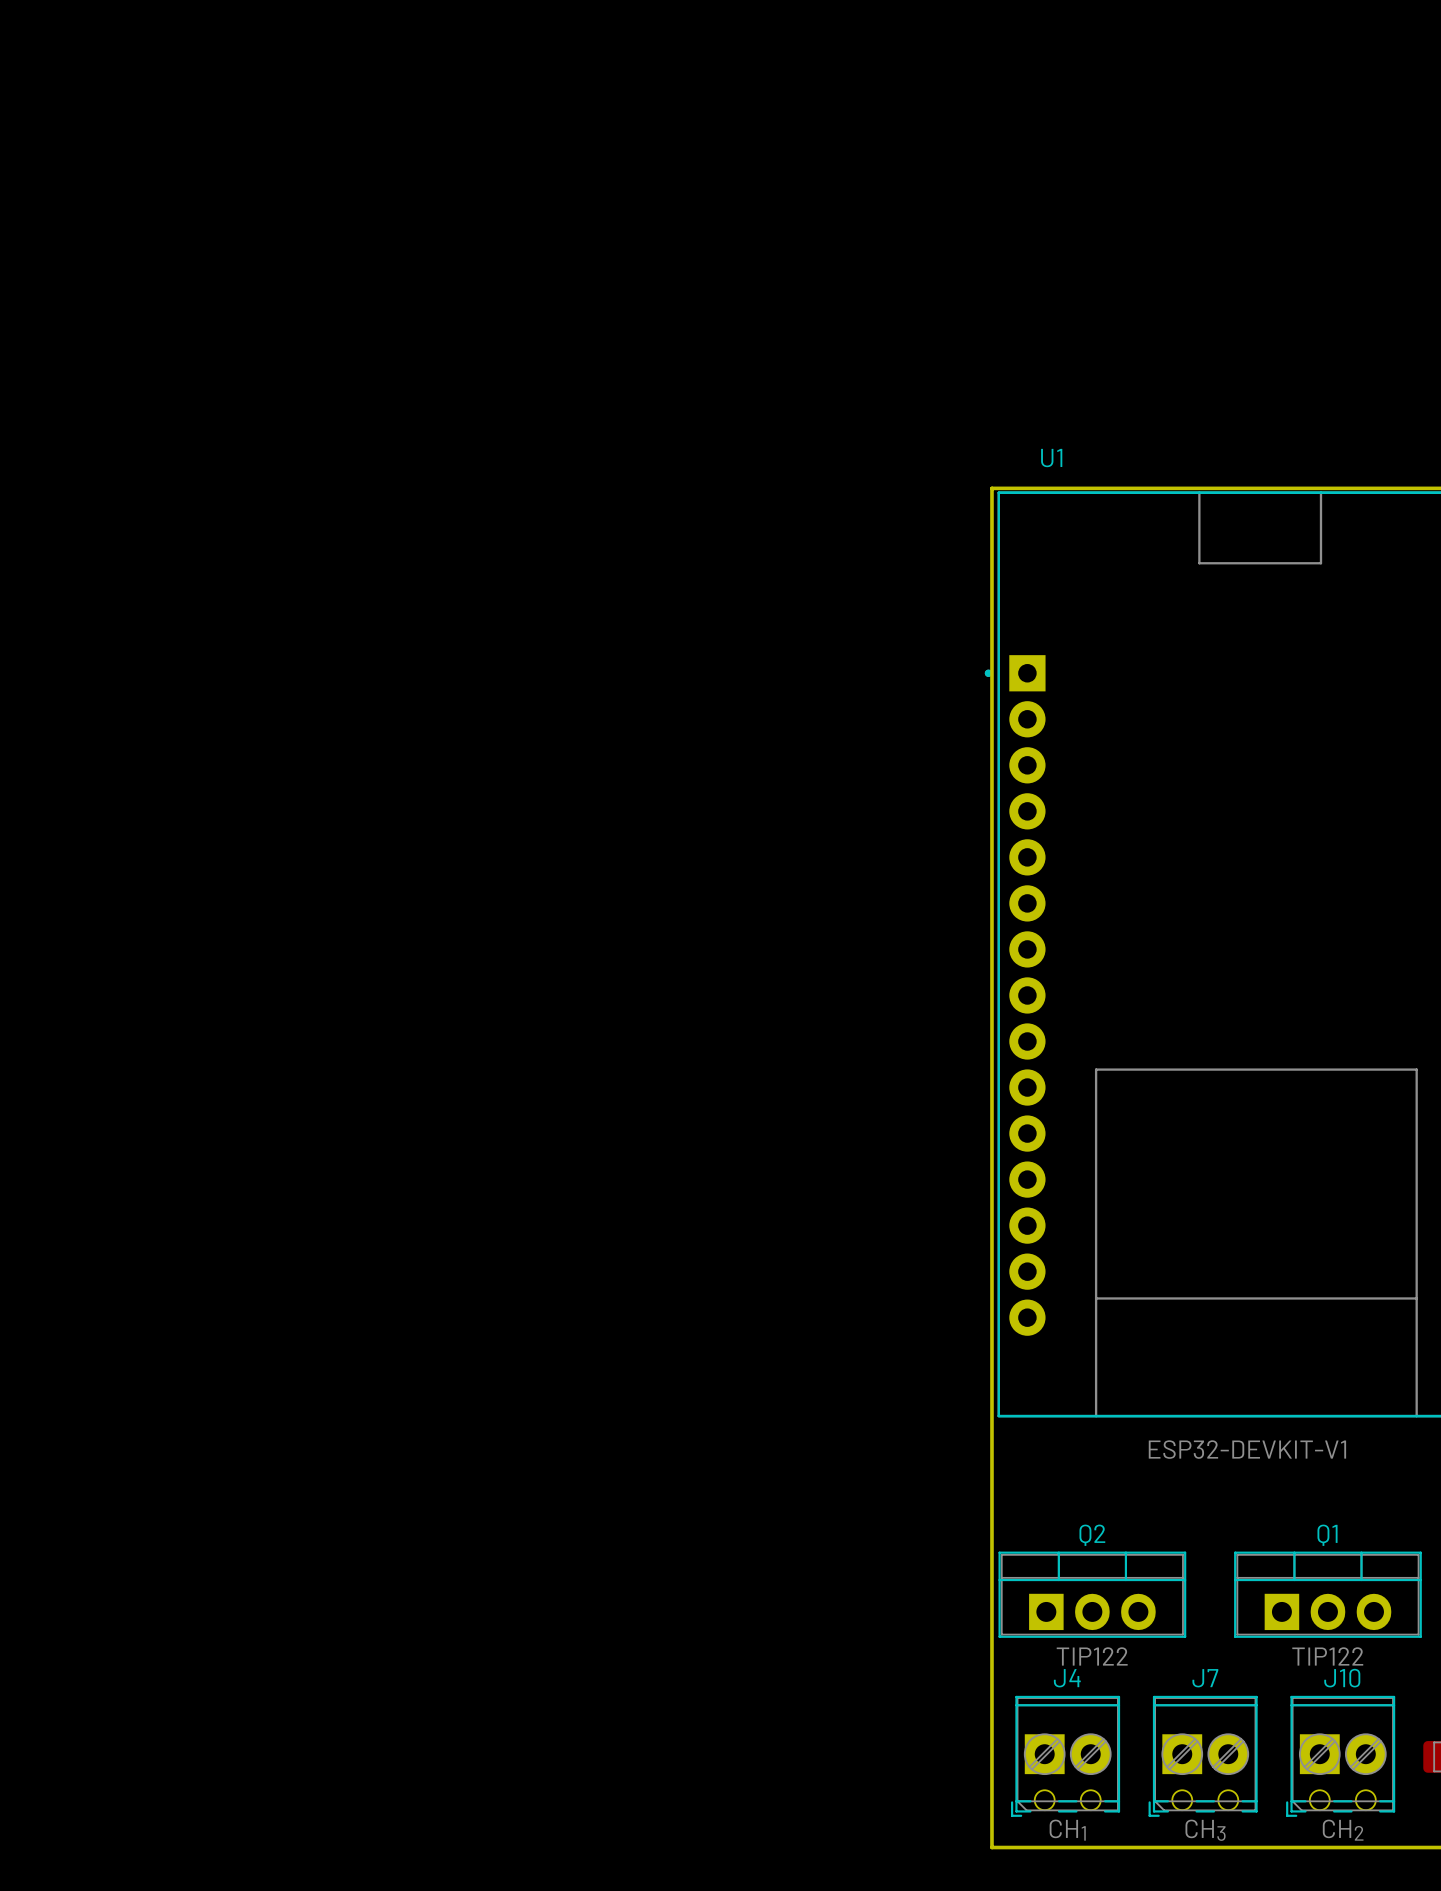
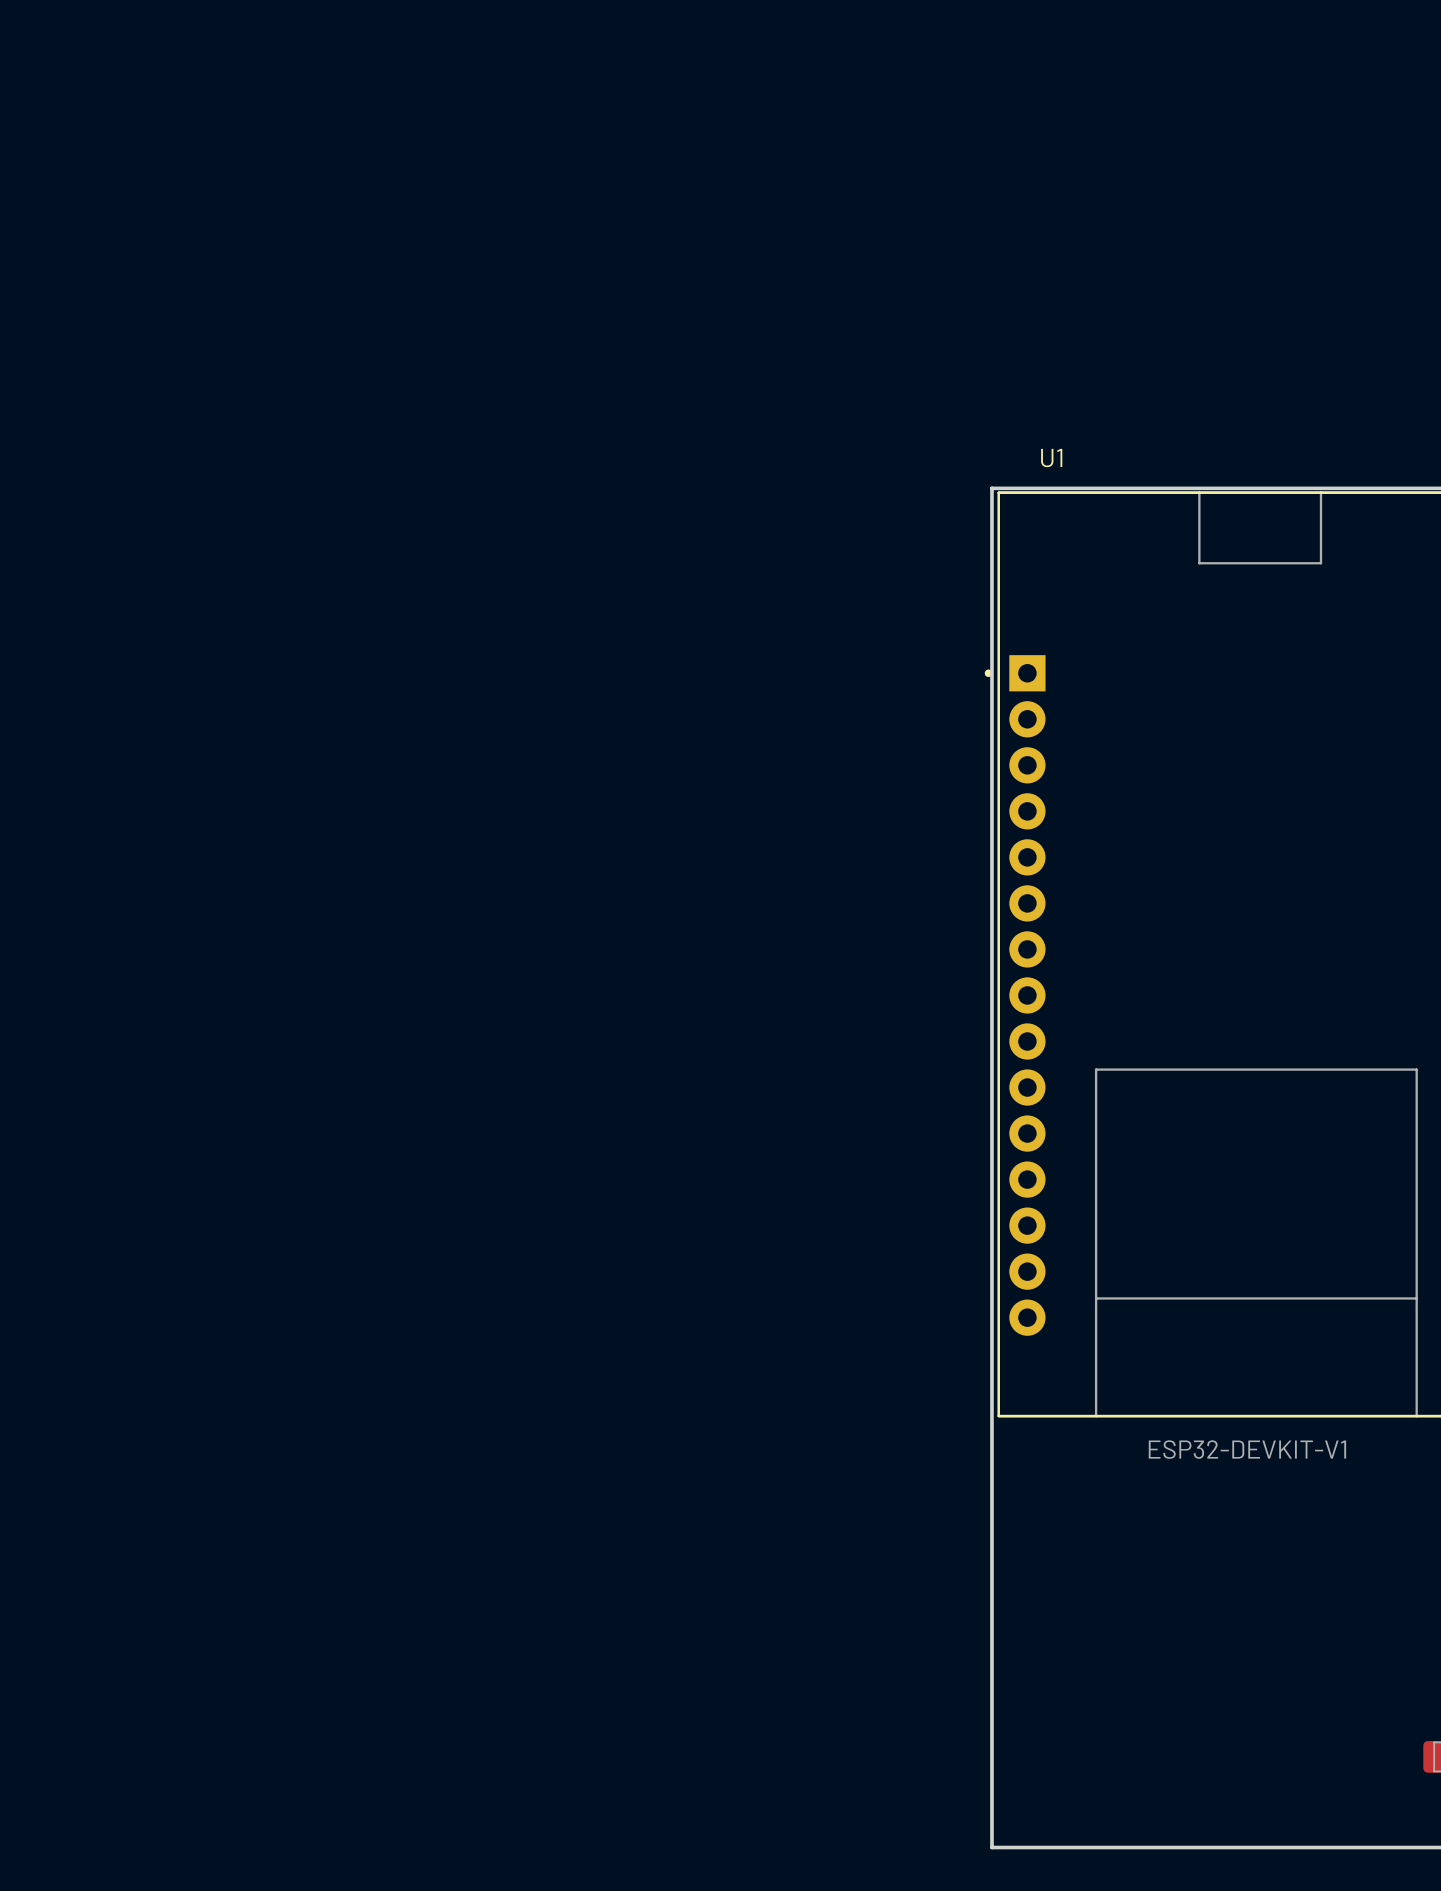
Q2: TIP122 (1092, 1594) -> none
Q1: TIP122 (1327, 1594) -> none
J4: CH1 (1065, 1756) -> none
J7: CH3 (1203, 1756) -> none
J10: CH2 (1340, 1756) -> none

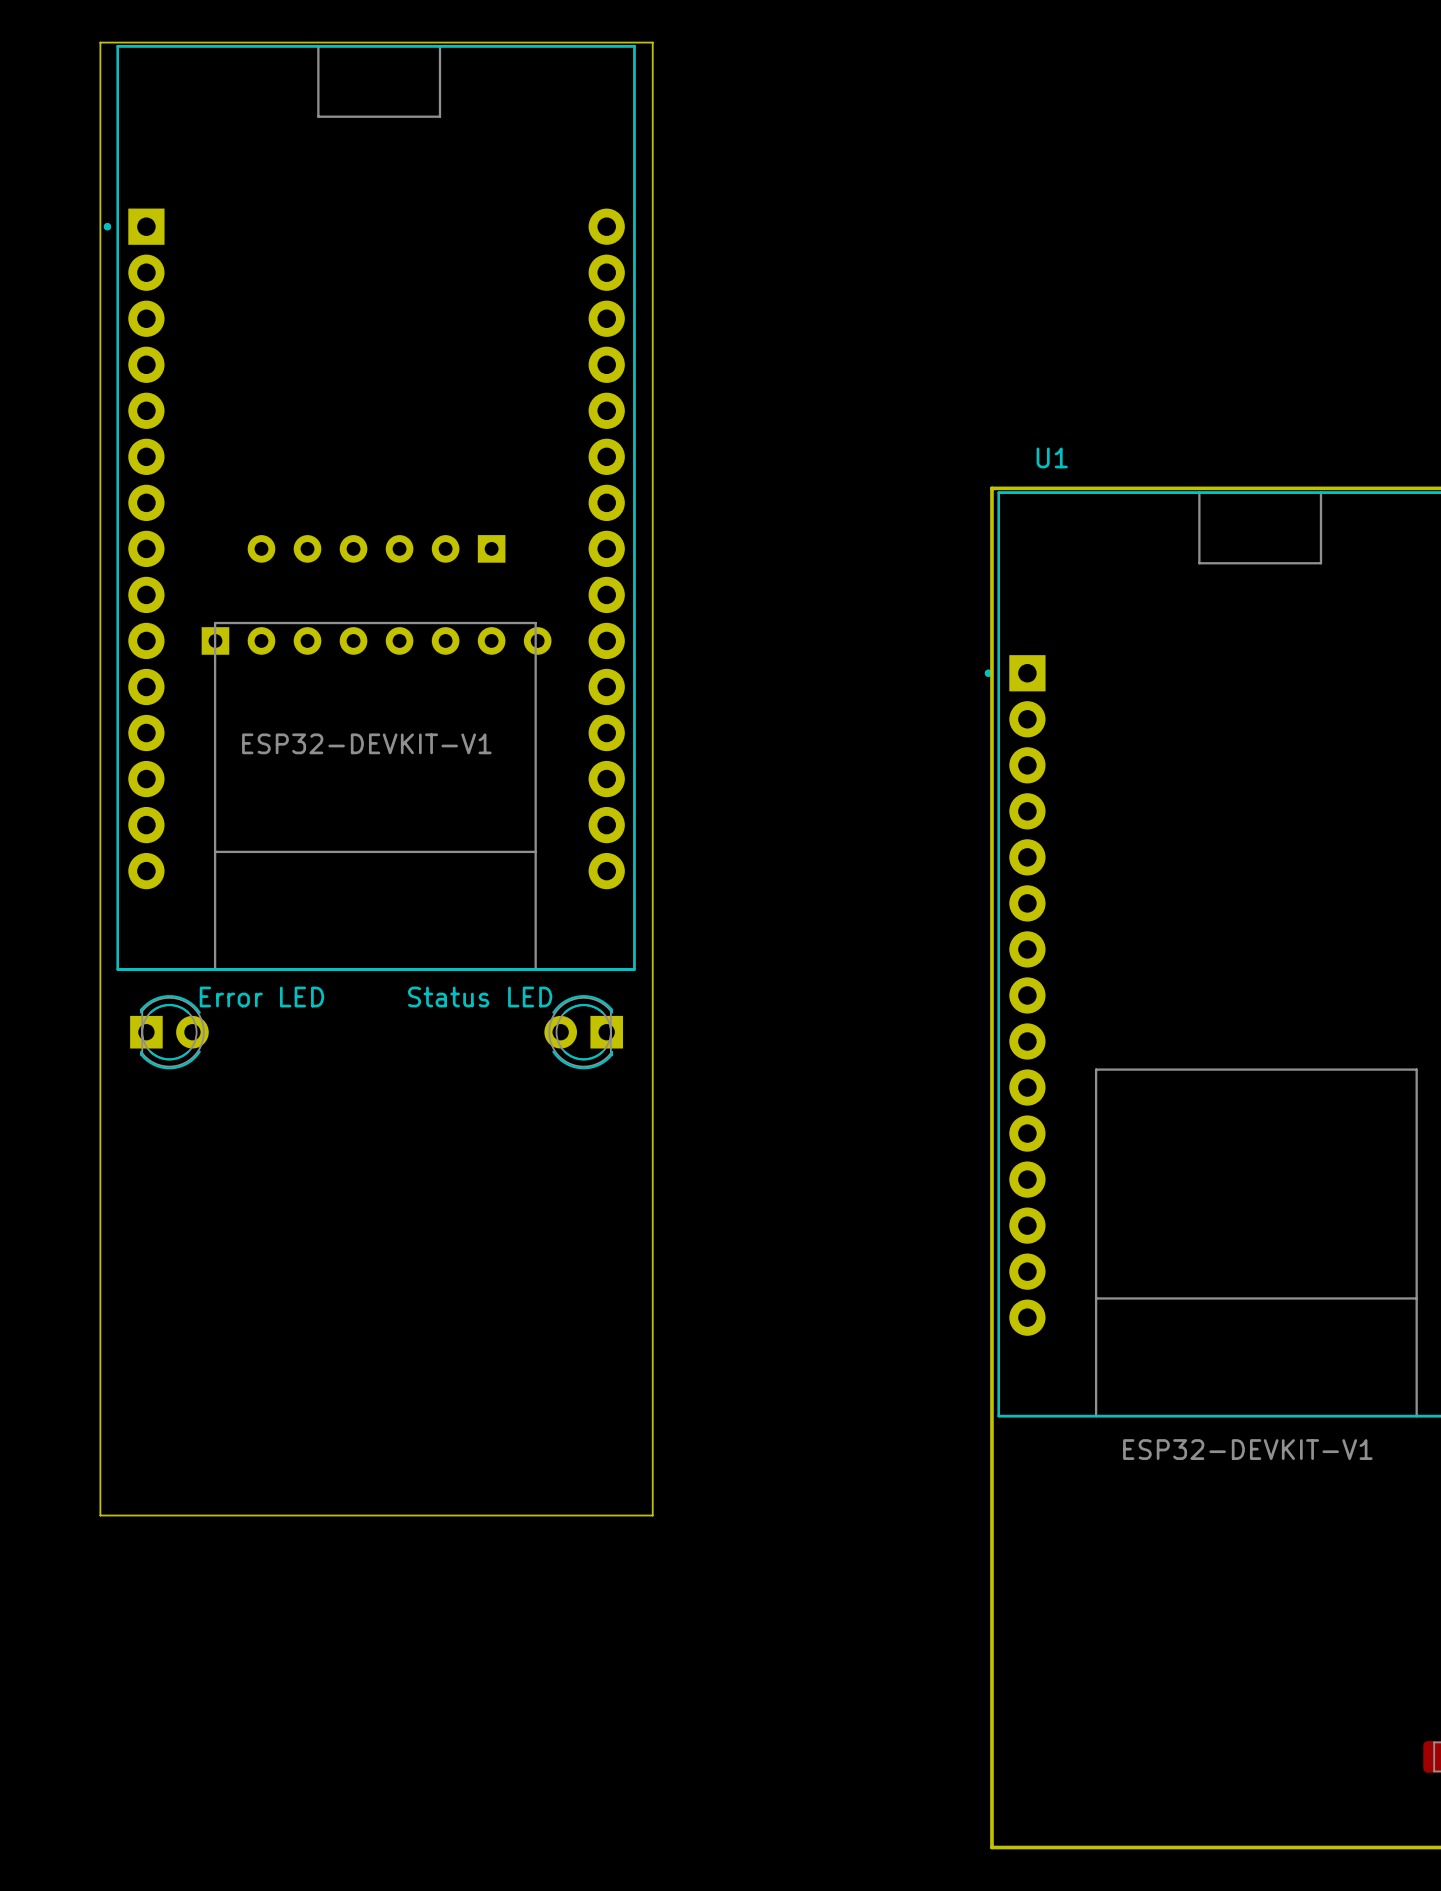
board edge: none -> (100, 42) (652, 42) (652, 1515) (100, 1515) (100, 42)
part: none -> ESP32-DEVKIT-V1 (369, 507)
part: none -> (376, 548)
part: none -> (376, 640)
part: none -> Error LED (169, 1032)
part: none -> Status LED (583, 1032)

